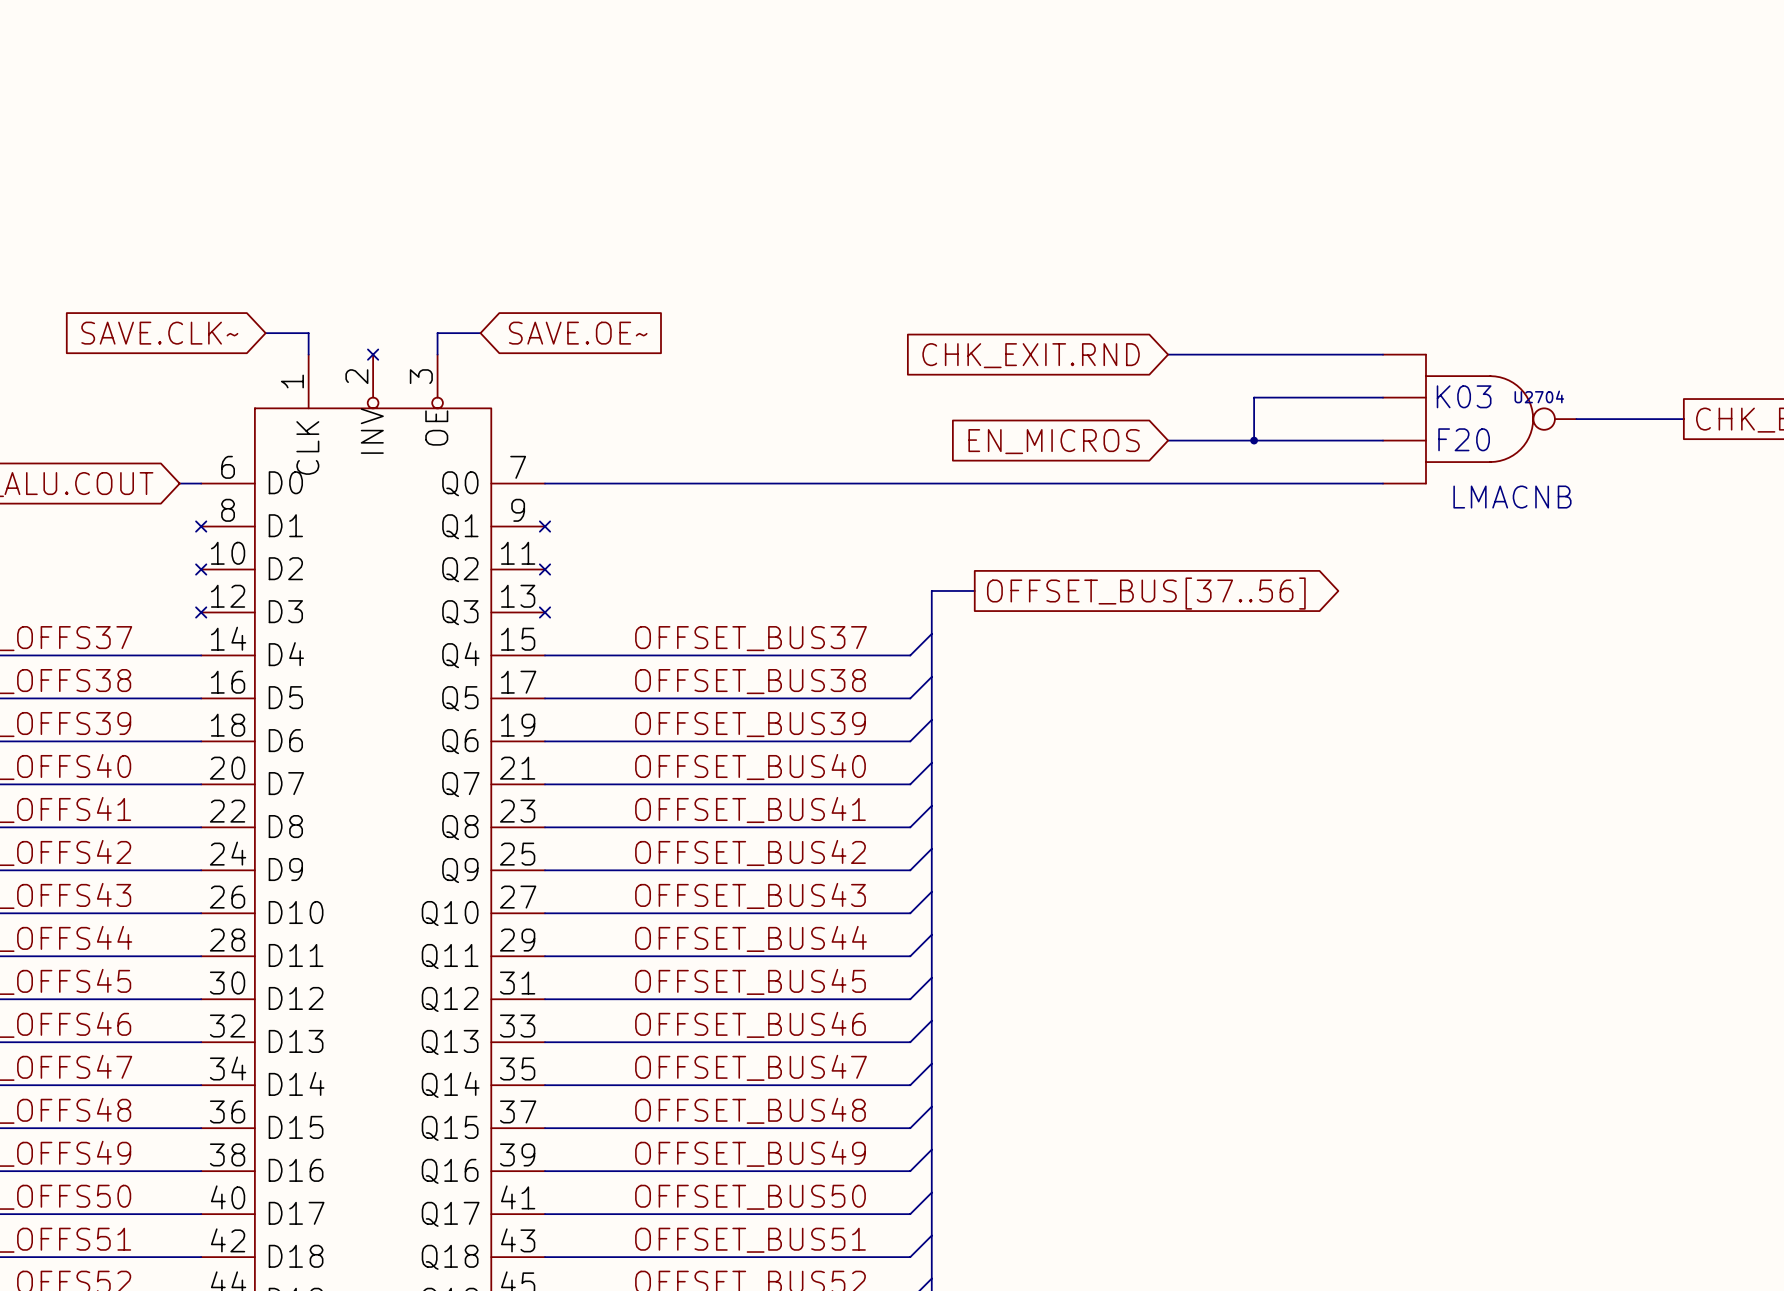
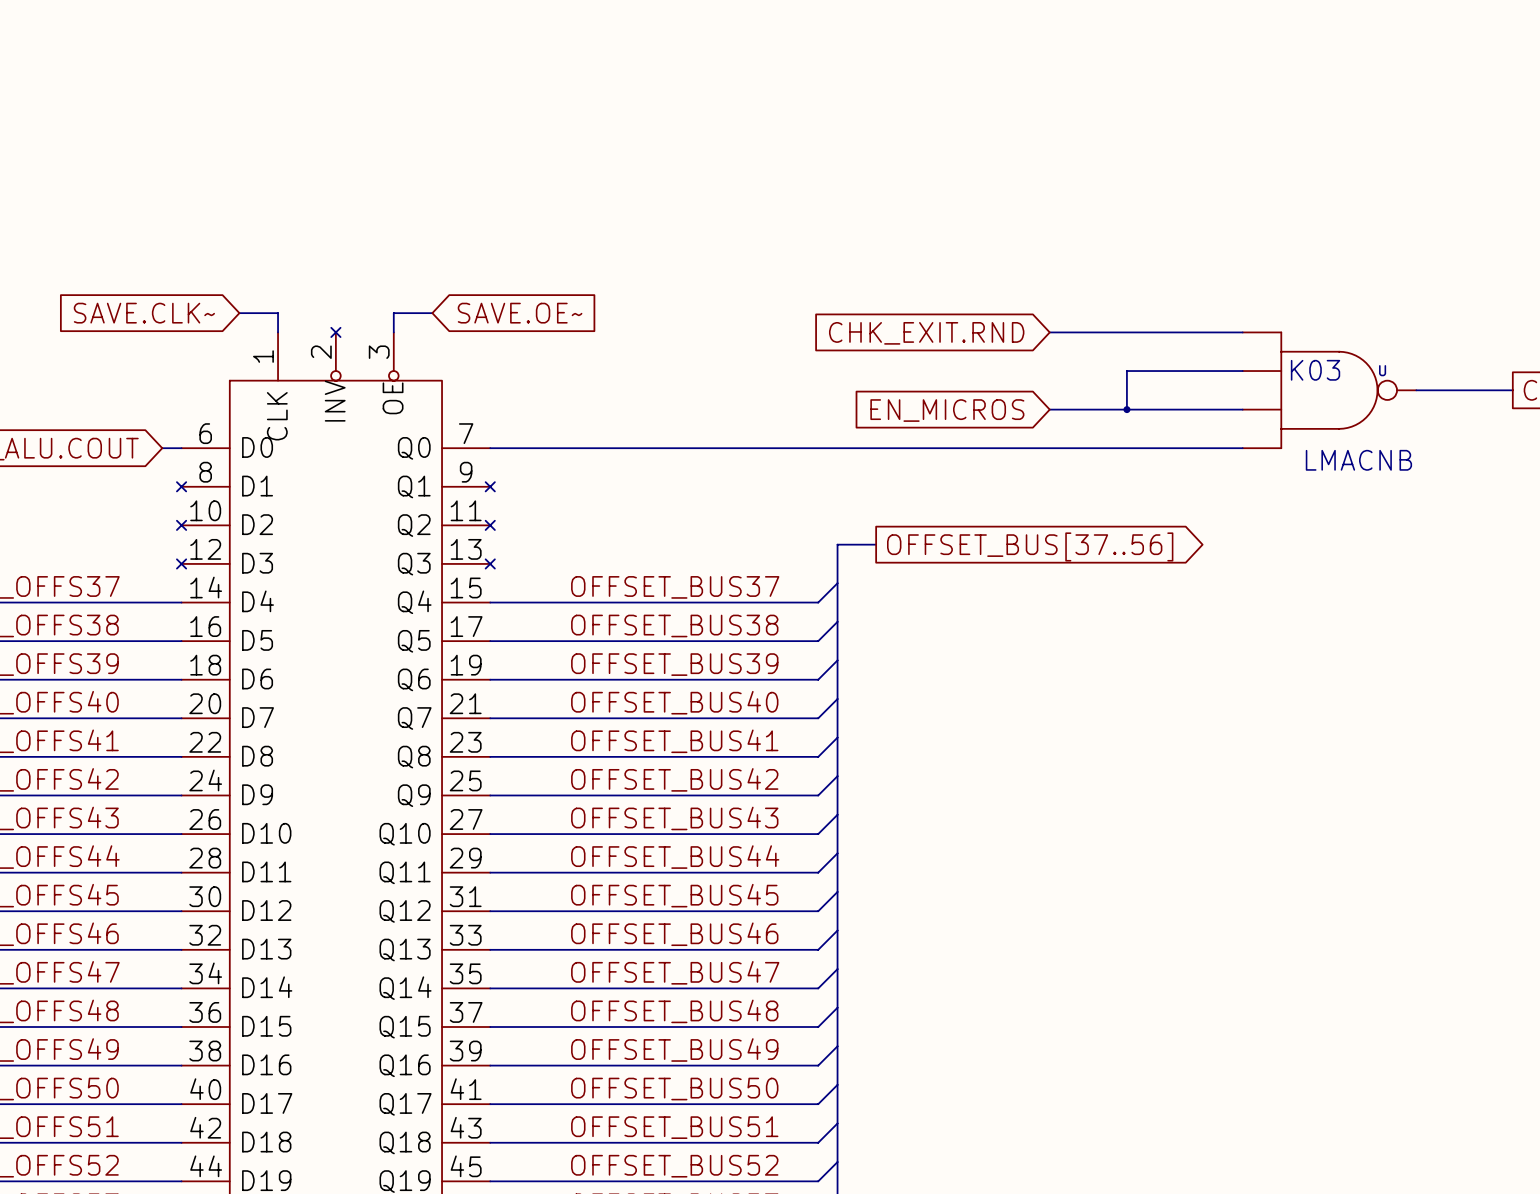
U2704 name: U2704 (1539, 396) -> U (1382, 370)
U2704 value: F20 (1464, 439) -> none

